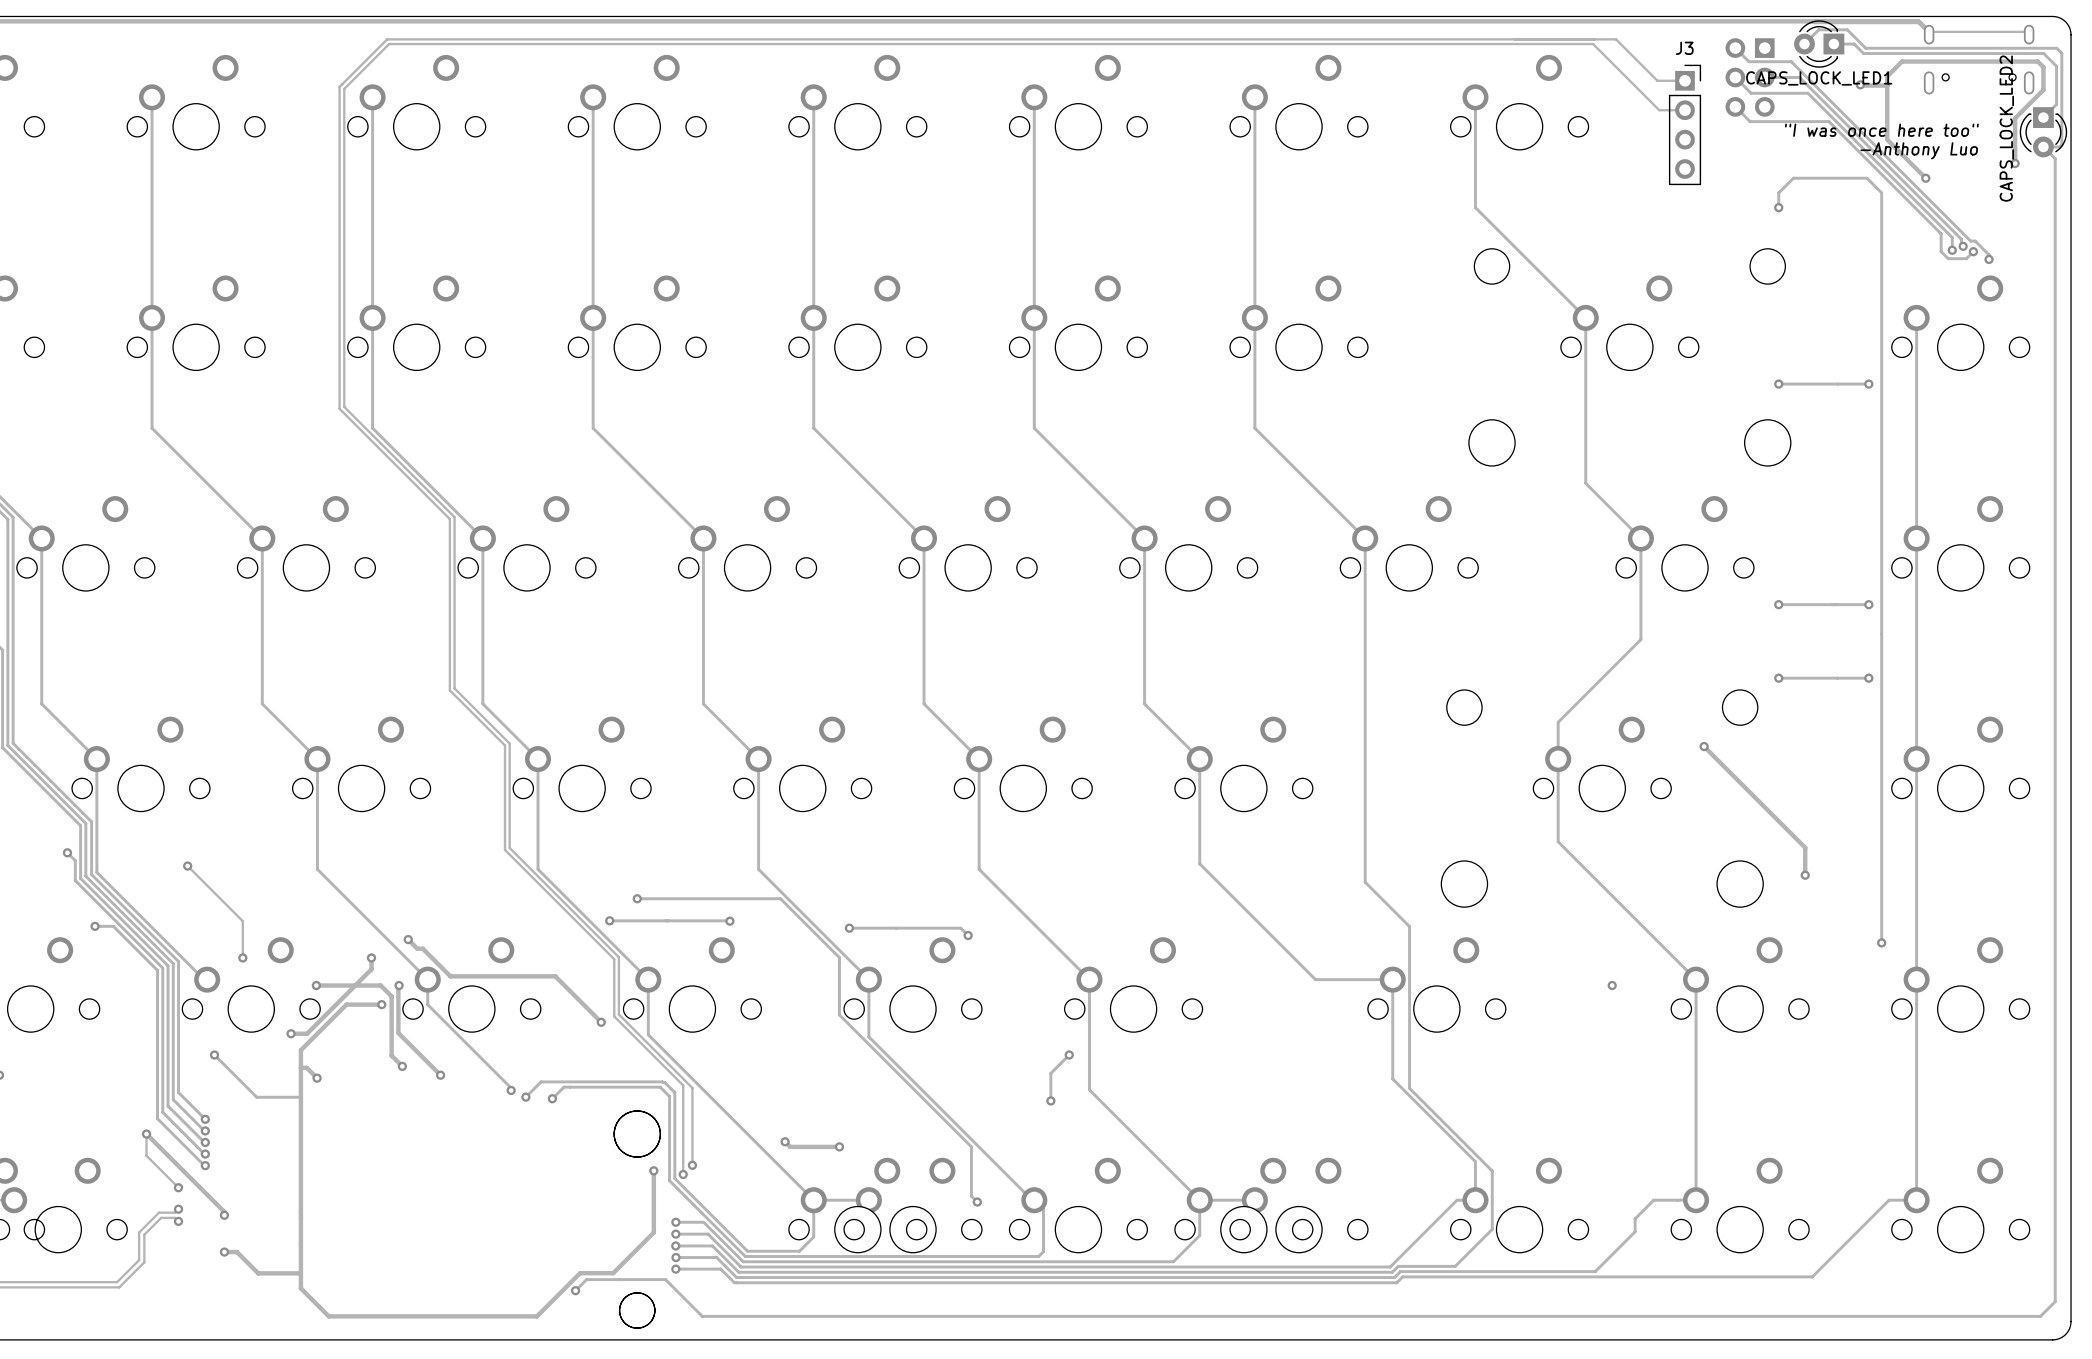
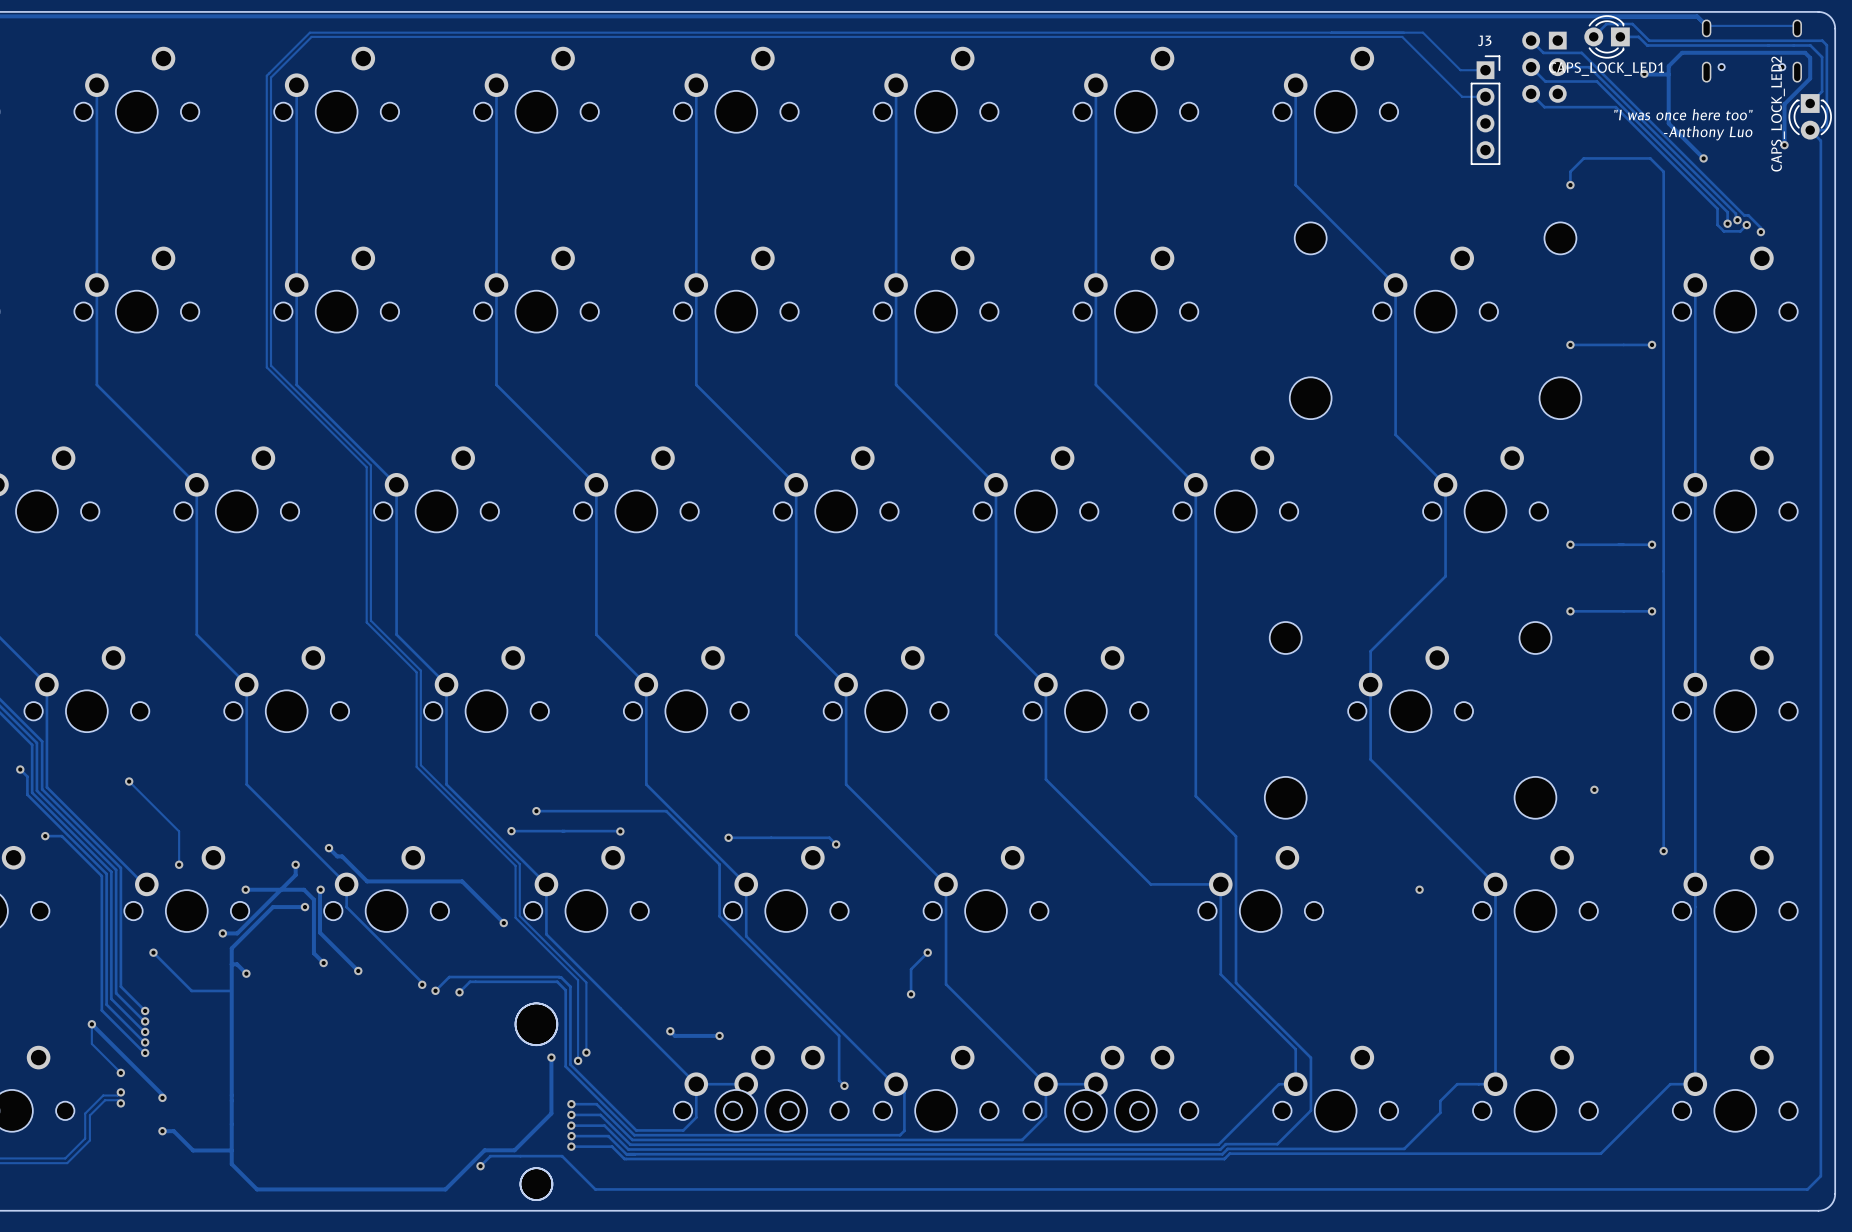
track: (1704, 746) (1805, 847) (1805, 875) -> none
via: (1704, 746) -> none

